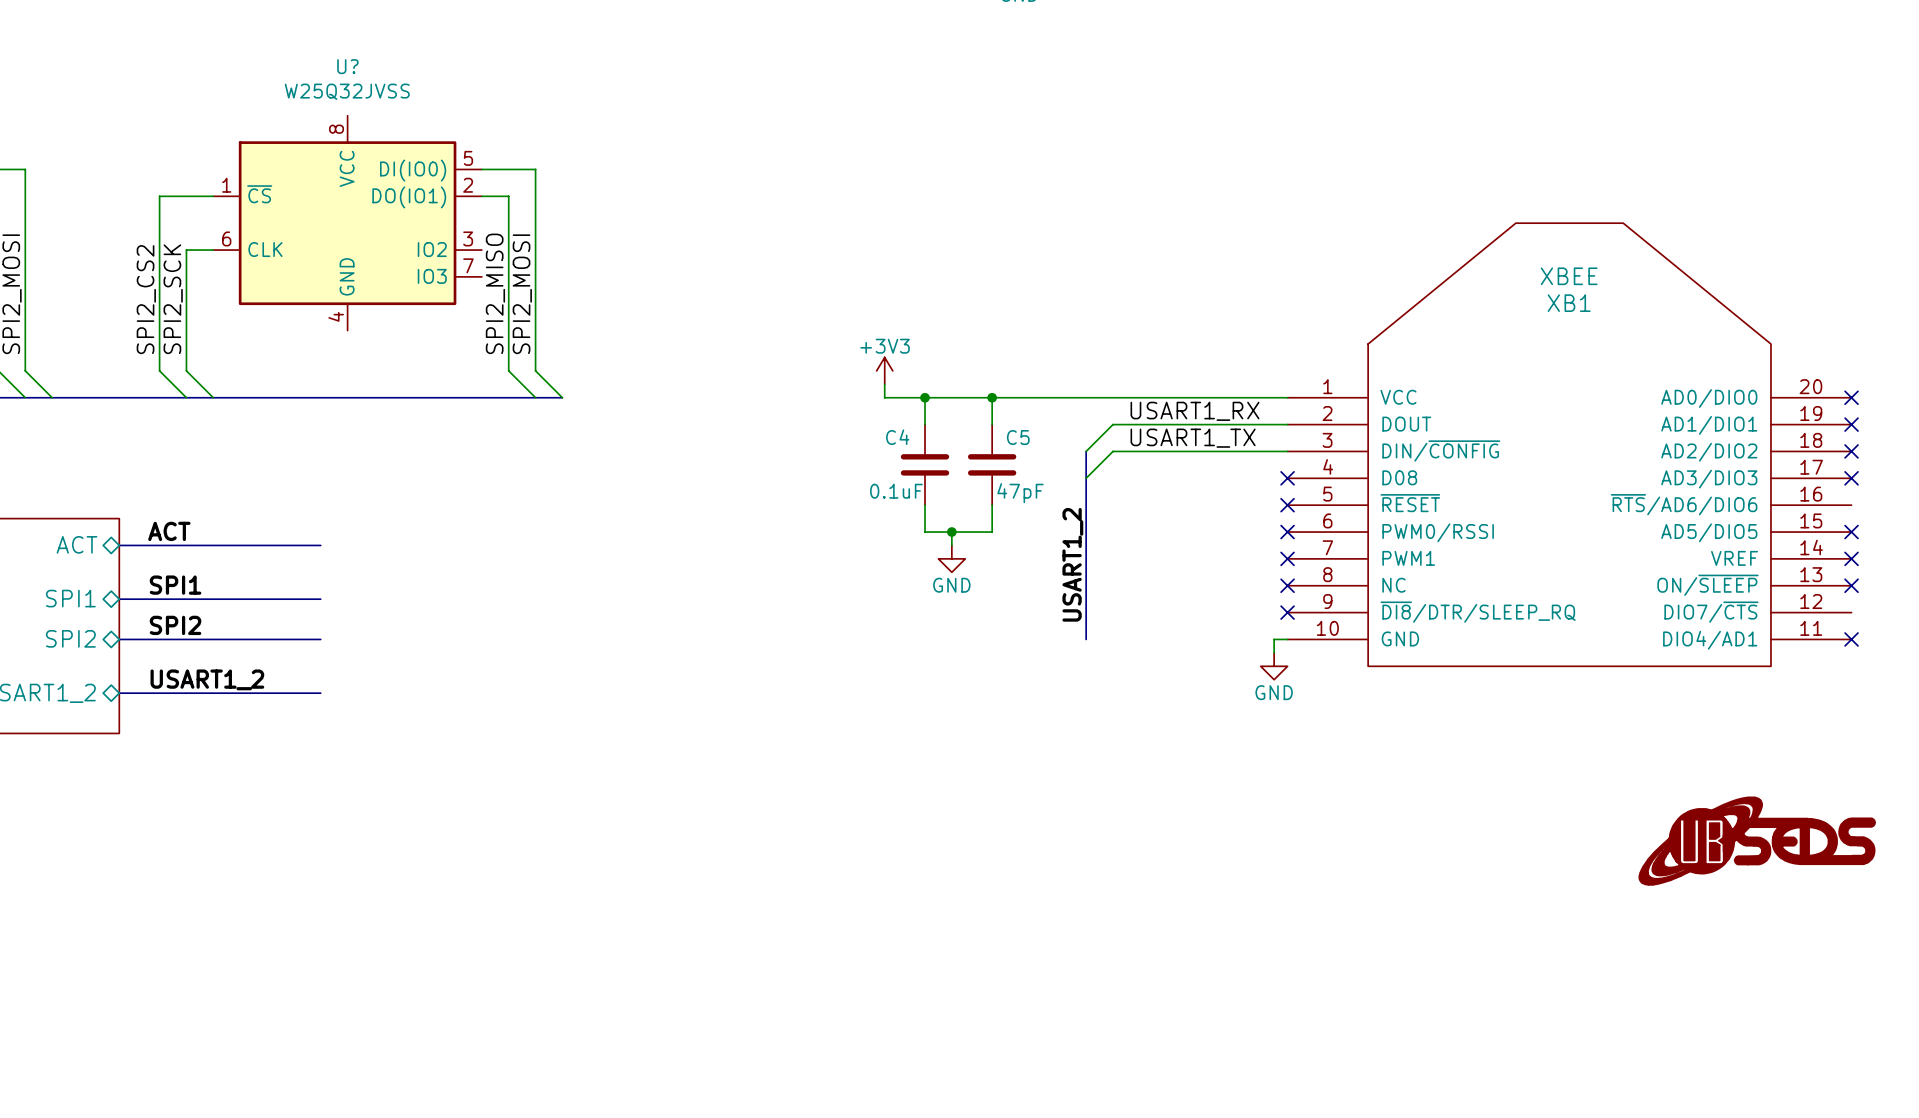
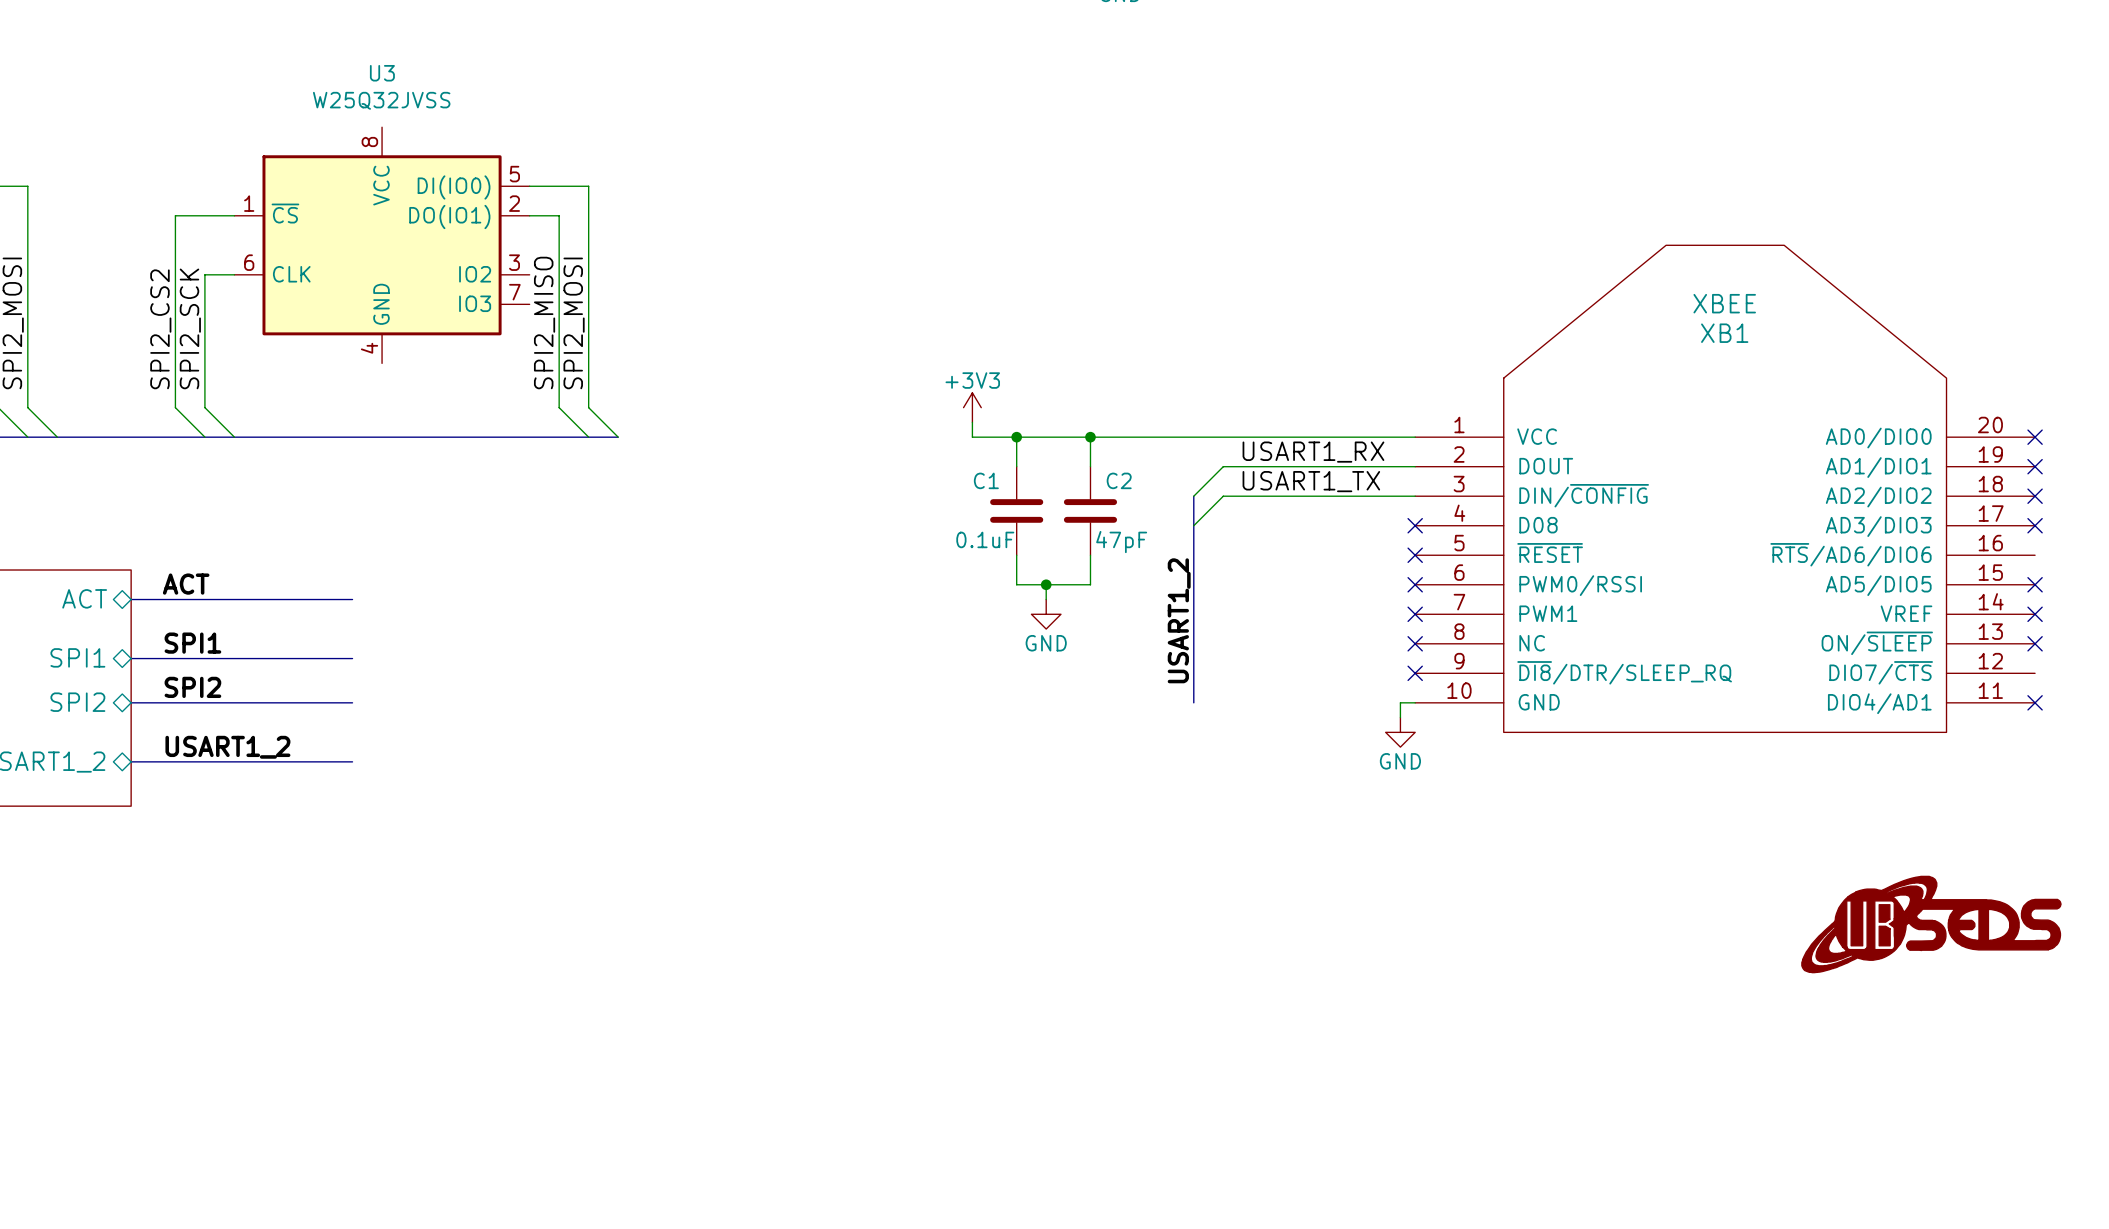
U? name: U? (347, 66) -> U3 (382, 73)
C4 name: C4 (897, 437) -> C1 (986, 480)
C5 name: C5 (1018, 437) -> C2 (1119, 480)

